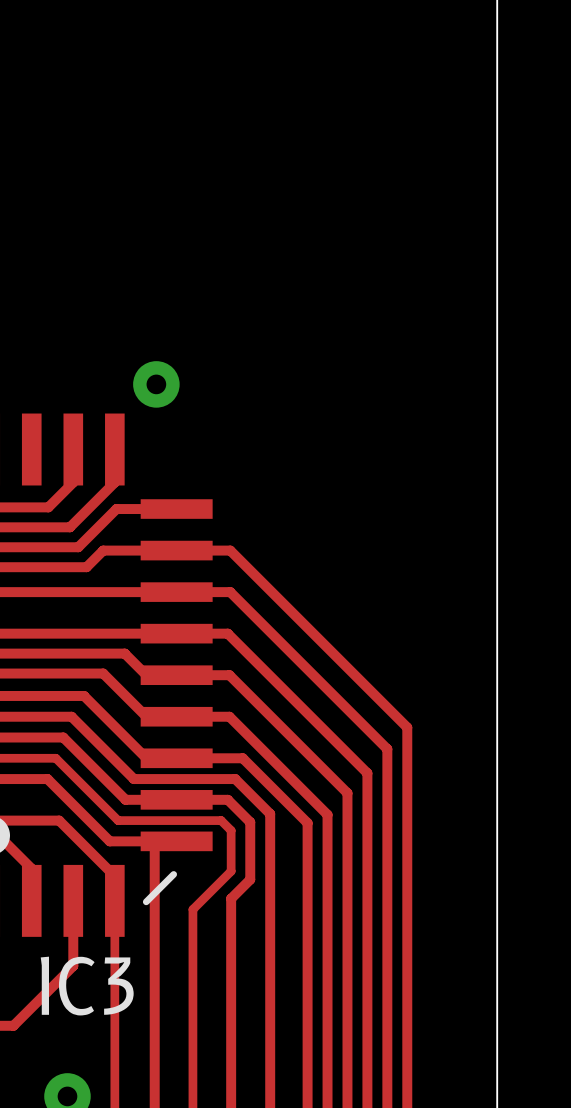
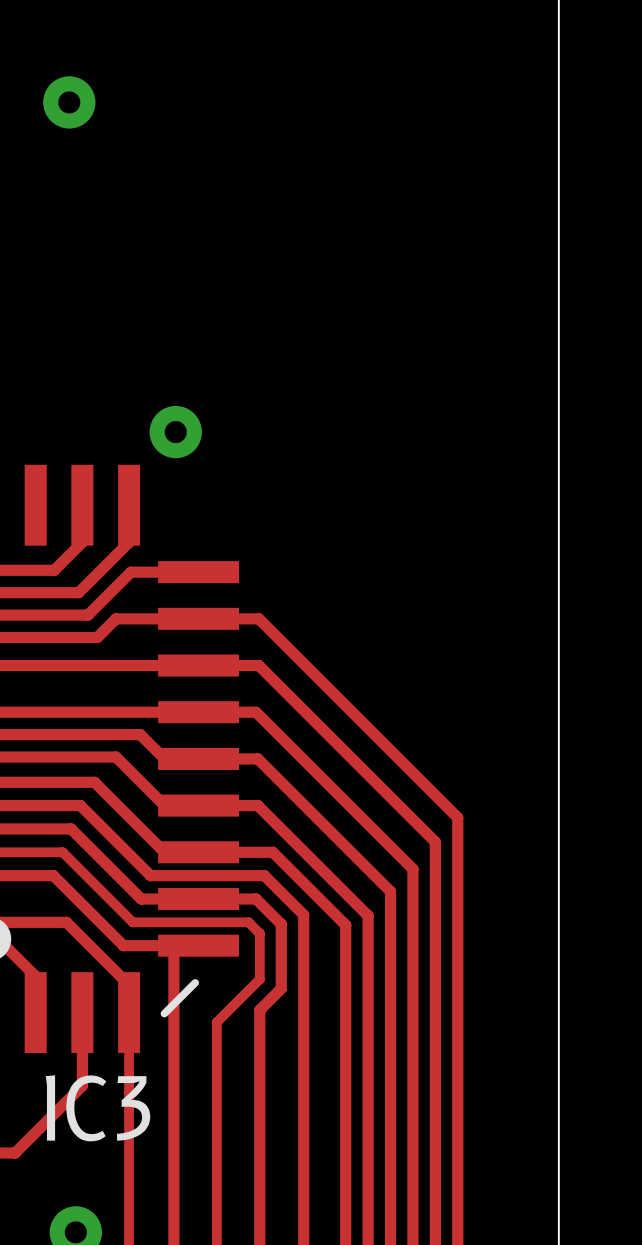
via: none -> (69, 102)

